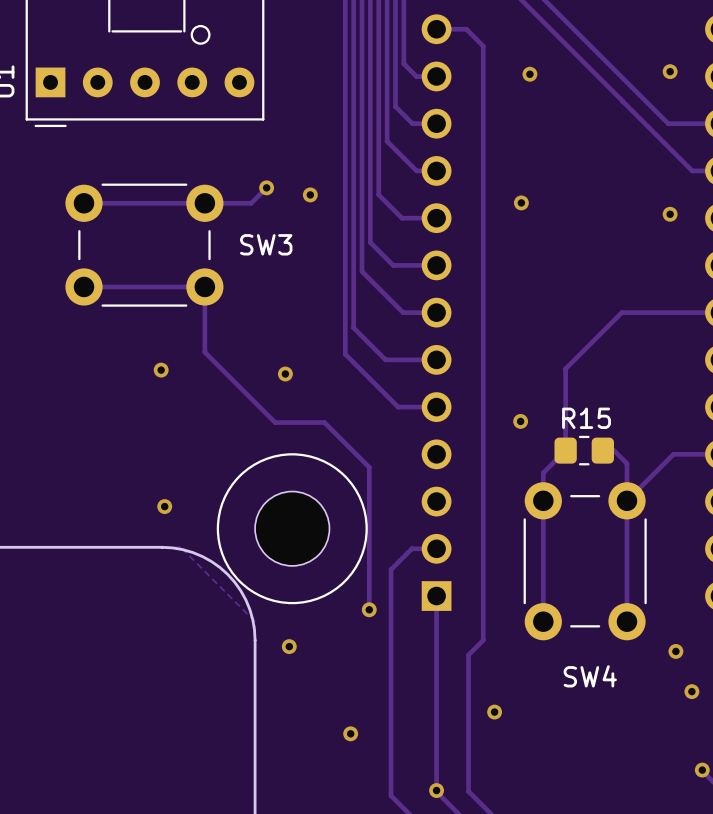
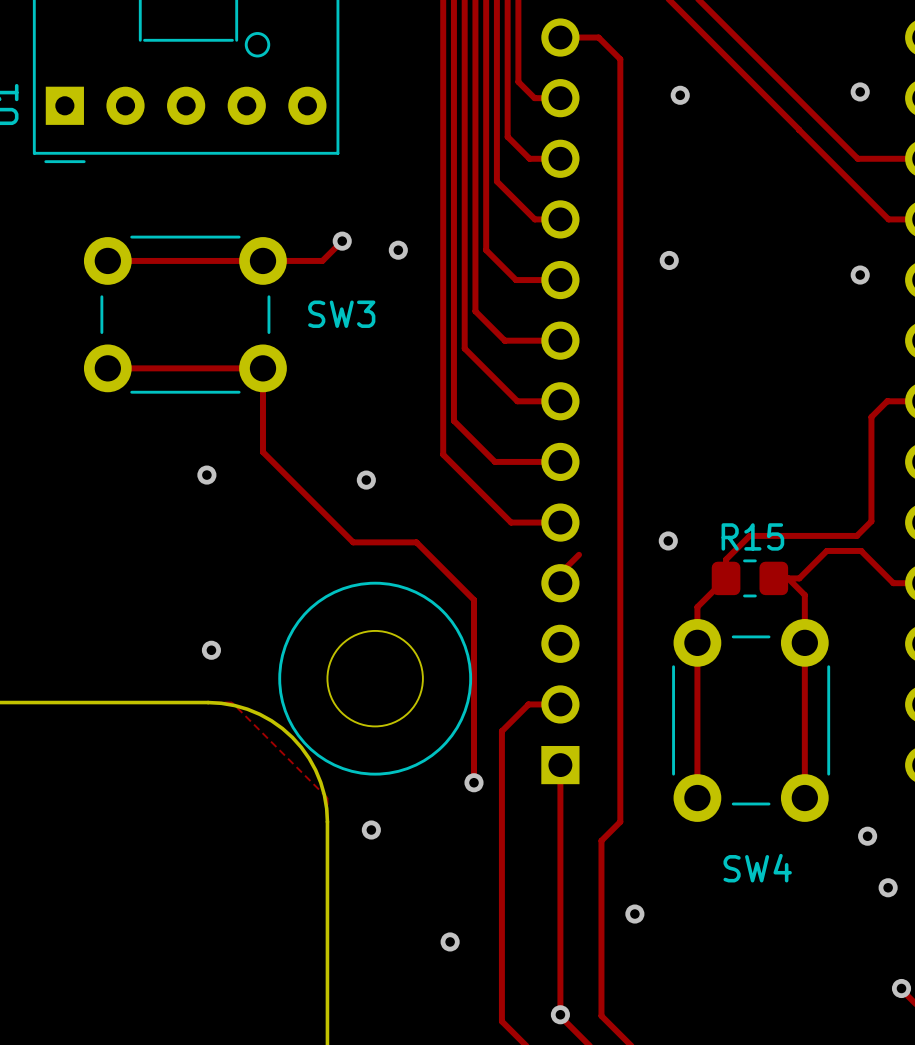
track: (691, 312) (621, 312) (565, 368) (565, 435) -> (887, 401) (871, 417) (871, 521) (856, 535) (749, 535) (726, 559)
track: none -> (861, 550) (826, 550) (799, 578) (788, 578)
track: none -> (579, 554) (560, 573) (560, 583)
track: (695, 454) (673, 454) (627, 500) -> (893, 583) (861, 551)

